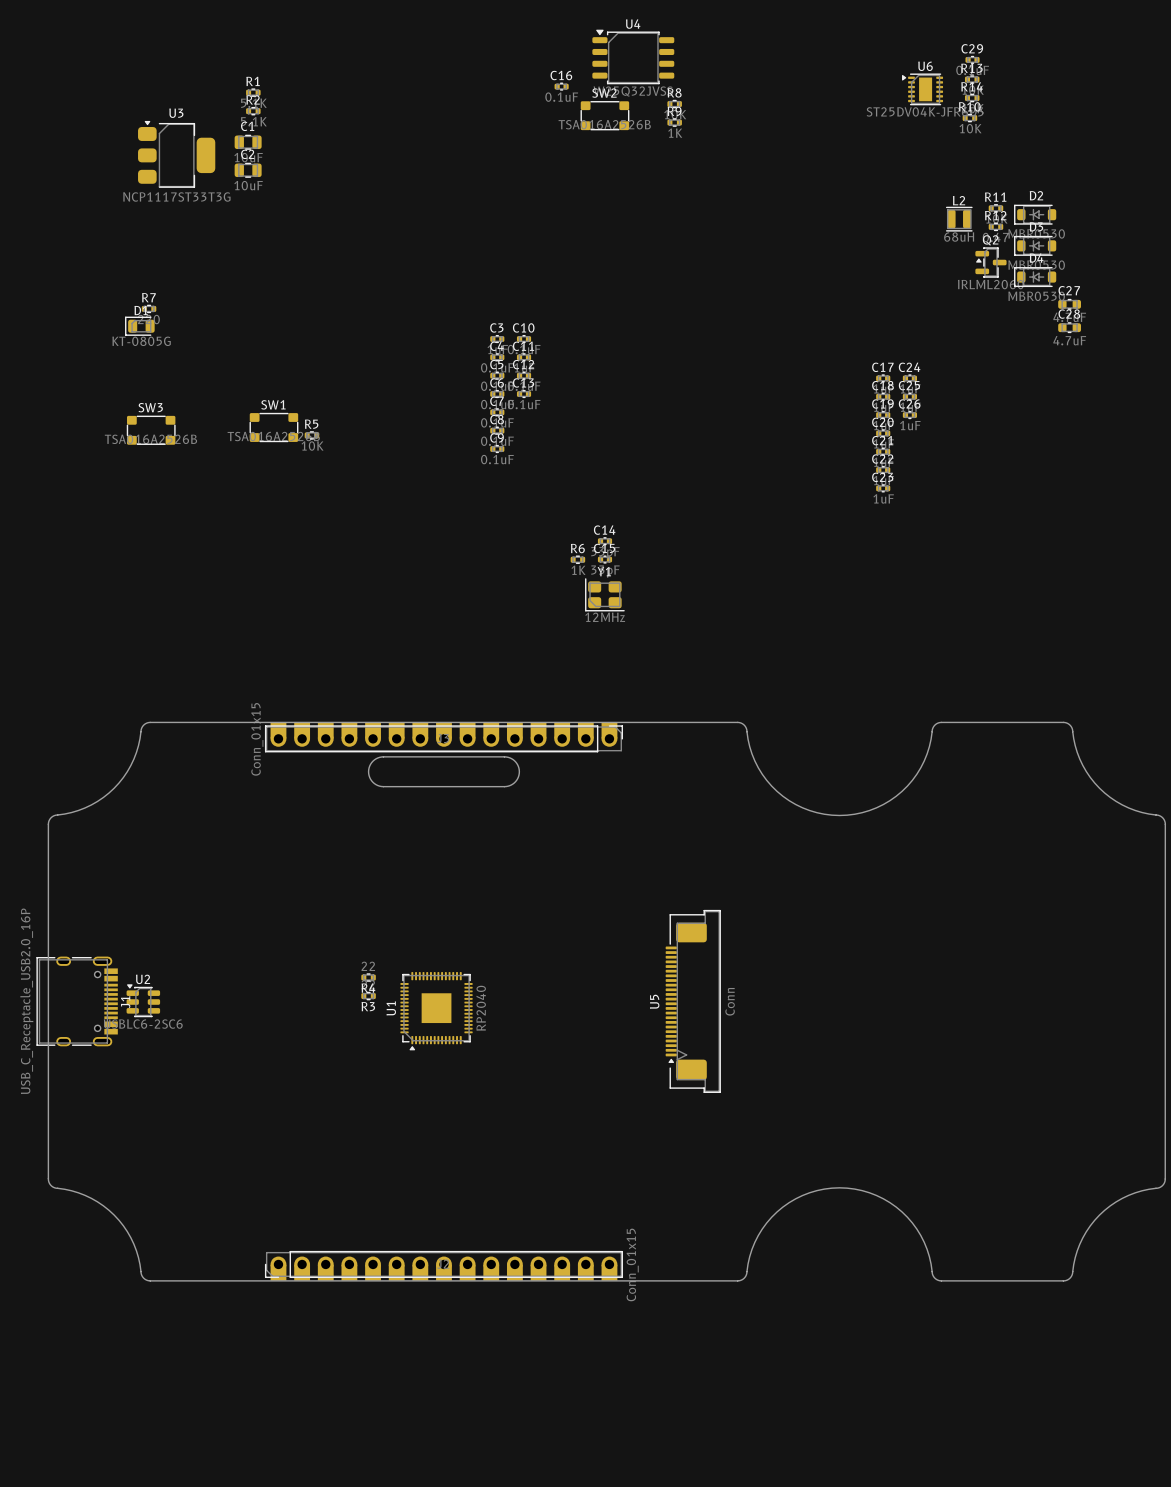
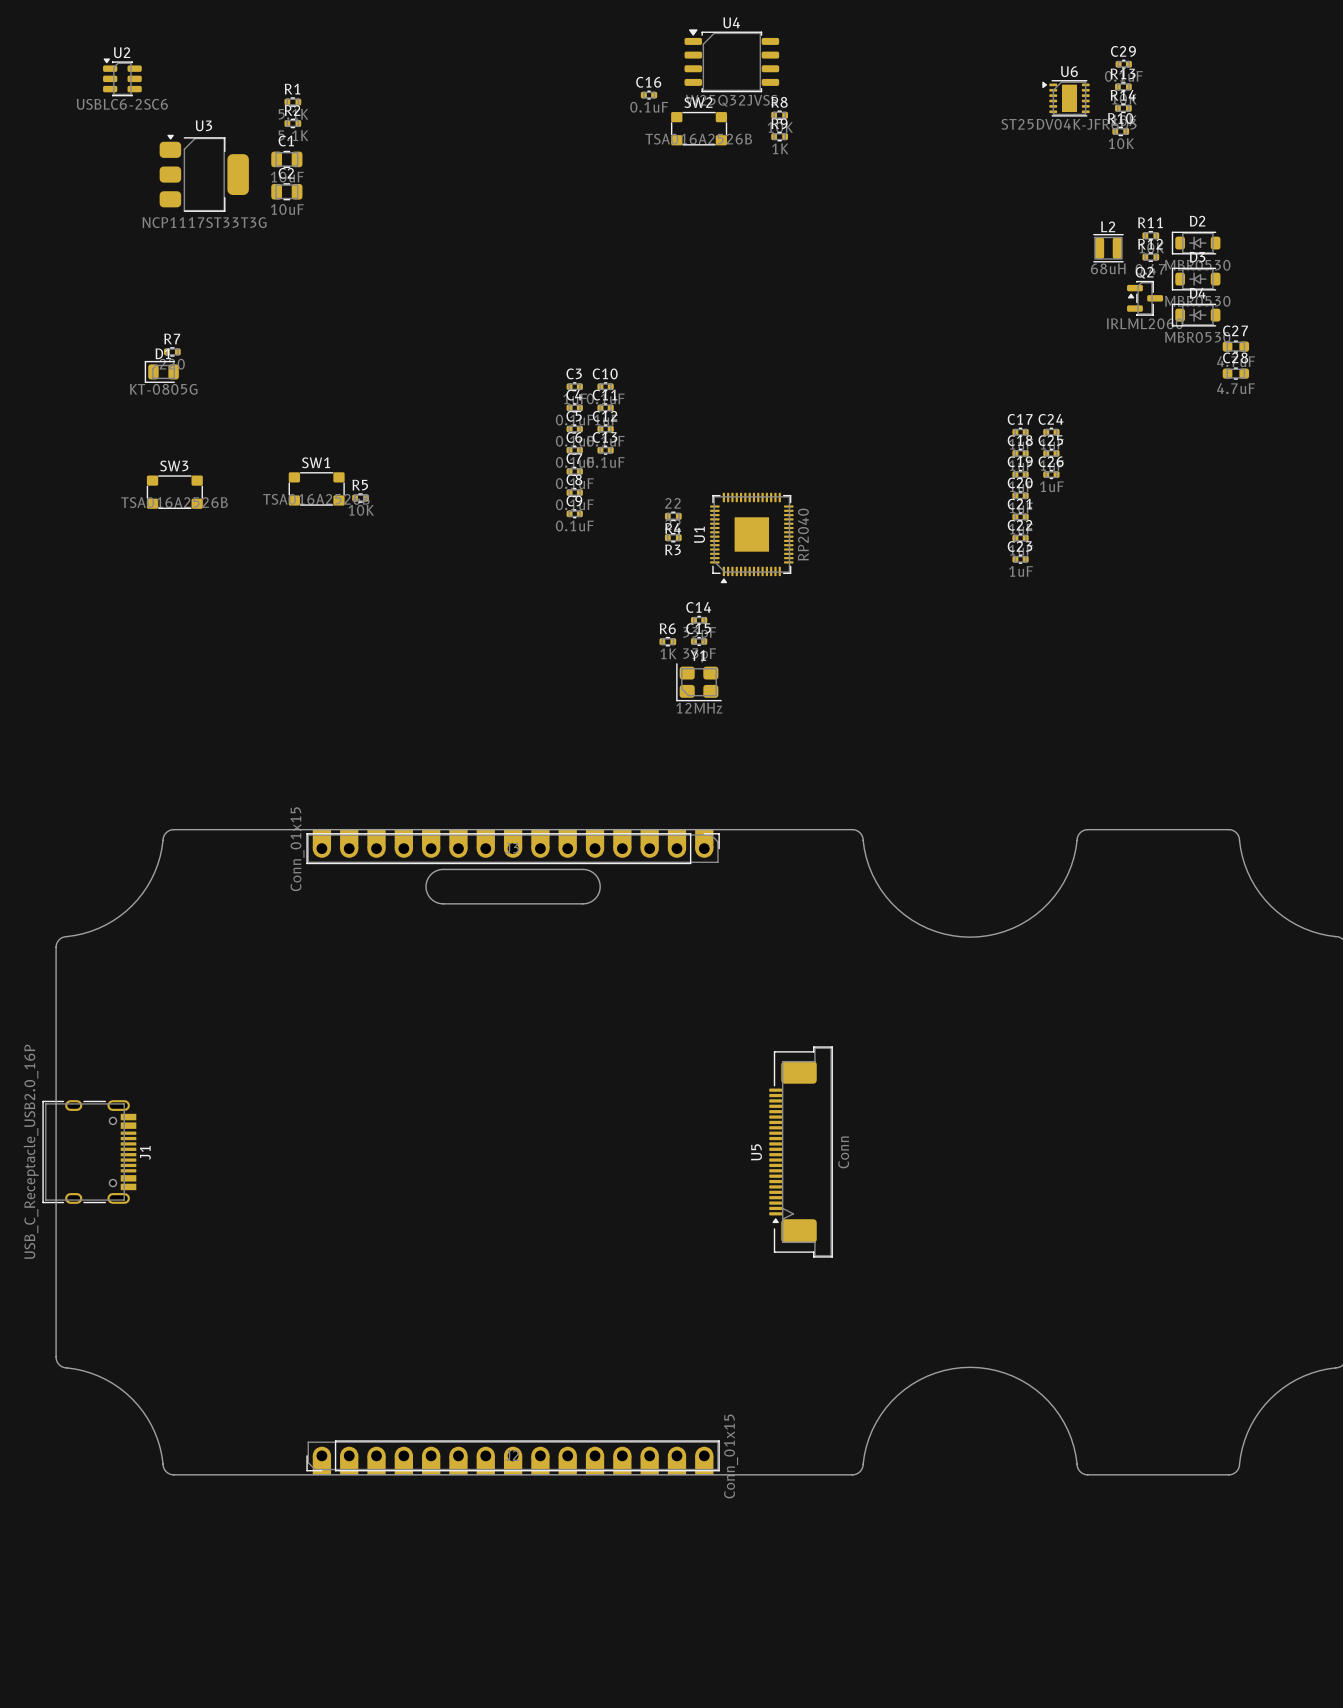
R4 position: (368, 977) -> (673, 516)
R3 position: (368, 996) -> (673, 537)
U2 position: (143, 1000) -> (122, 77)
U1 position: (436, 1011) -> (751, 537)

